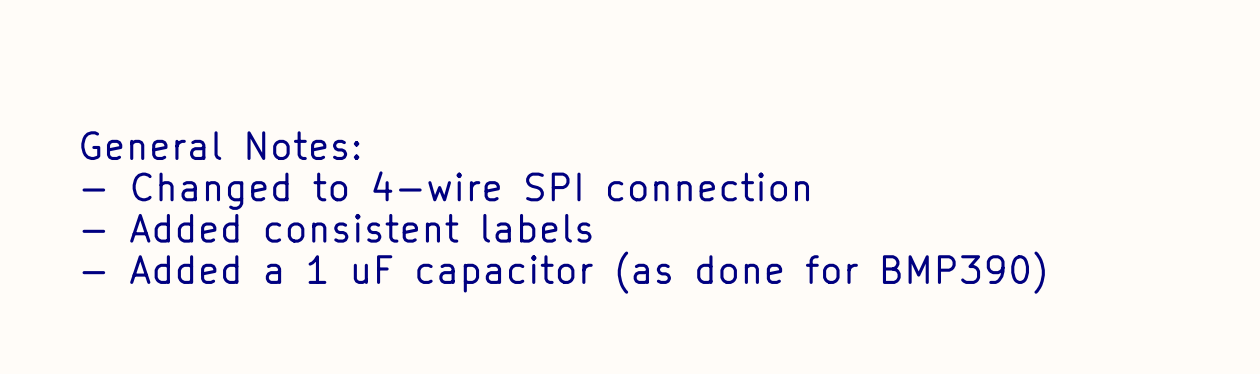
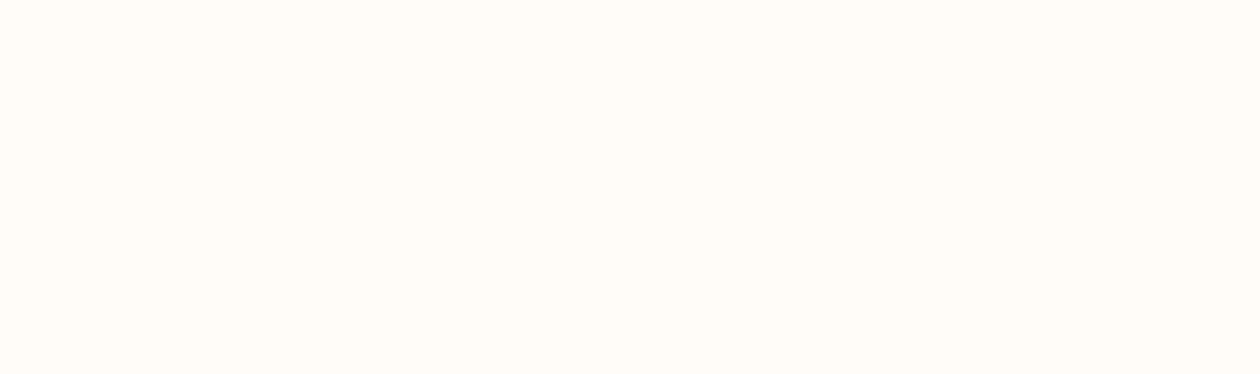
text: General Notes: (220, 145) -> none
text: - Changed to 4-wire SPI connection (445, 190) -> none
text: - Added consistent labels (337, 228) -> none
text: - Added a 1 uF capacitor (as done for BMP390) (563, 272) -> none

